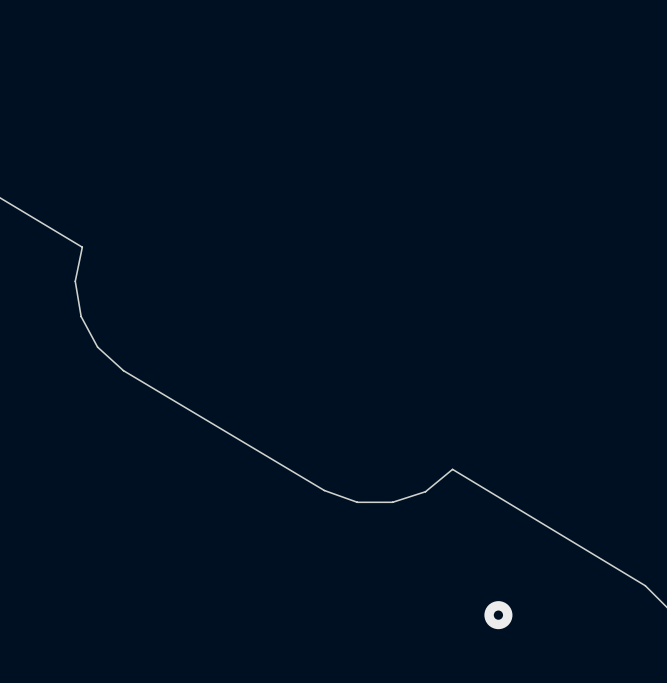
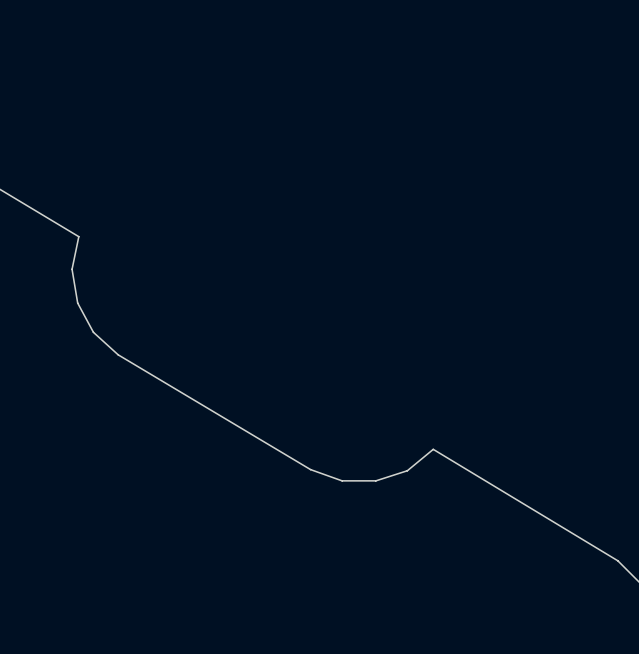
via: (498, 615) -> none

